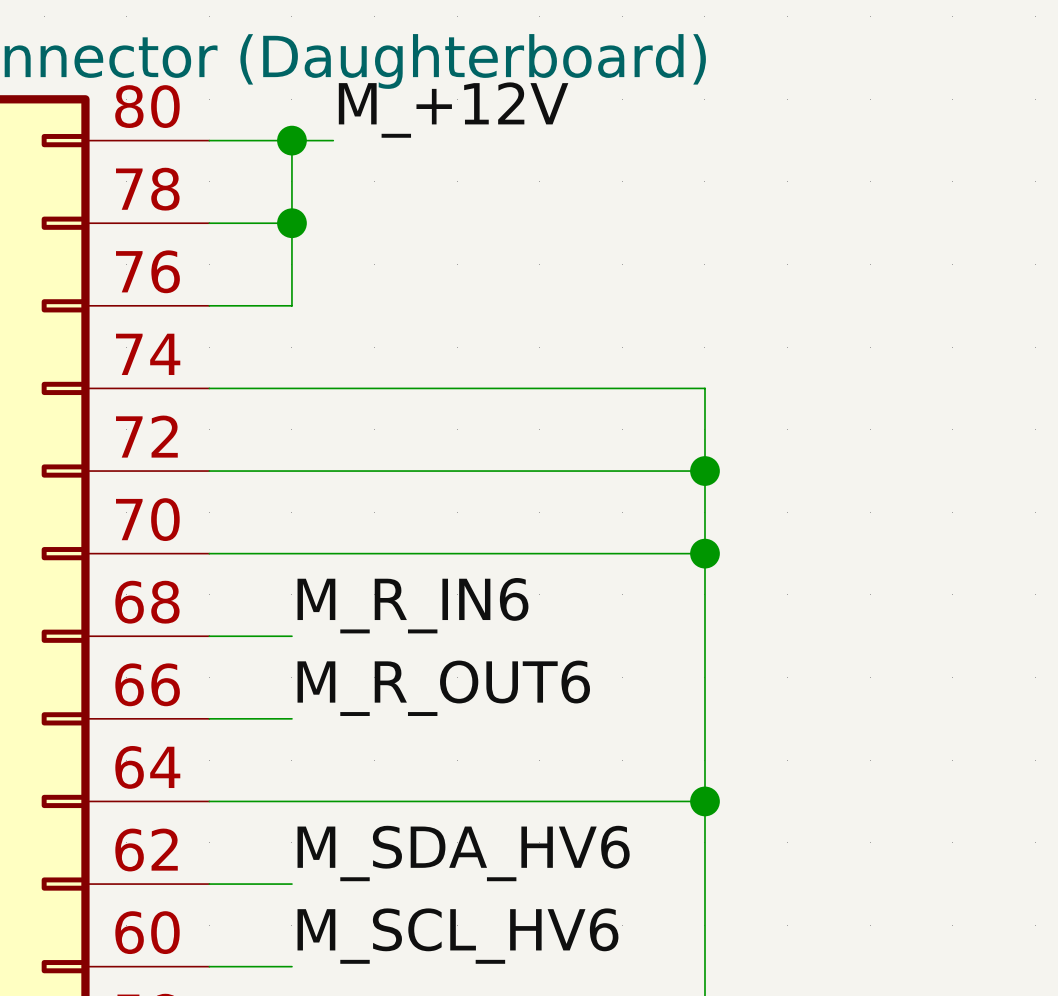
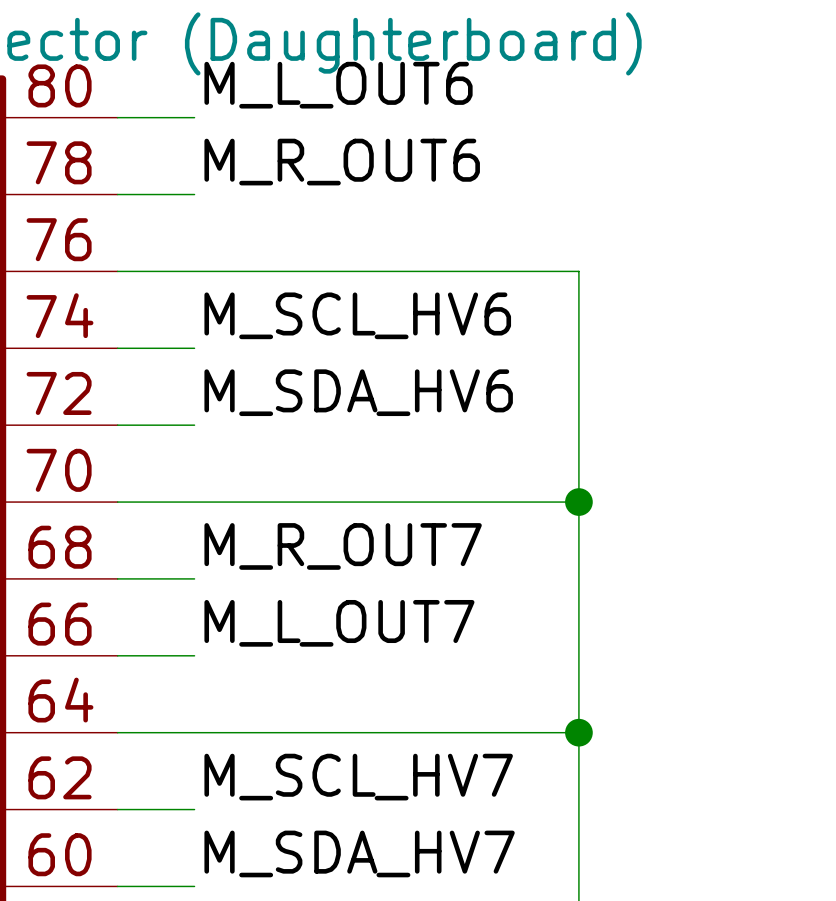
label: none -> M_L_OUT6 (338, 85)
label: M_+12V (453, 110) -> none
junction: (291, 140) -> none
wire: (333, 140) (291, 140) (291, 305) -> none
label: none -> M_R_OUT6 (342, 162)
junction: (291, 223) -> none
label: none -> M_SCL_HV6 (357, 315)
wire: (291, 388) (704, 388) -> (194, 271) (578, 271) (578, 348)
label: none -> M_SDA_HV6 (358, 392)
wire: (291, 471) (704, 471) -> none
junction: (704, 471) -> none
label: M_R_IN6 (412, 605) -> M_R_OUT7 (343, 546)
label: M_R_OUT6 (443, 688) -> M_L_OUT7 (339, 623)
label: M_SDA_HV6 (463, 853) -> M_SCL_HV7 (358, 777)
label: M_SCL_HV6 (457, 936) -> M_SDA_HV7 (359, 853)

